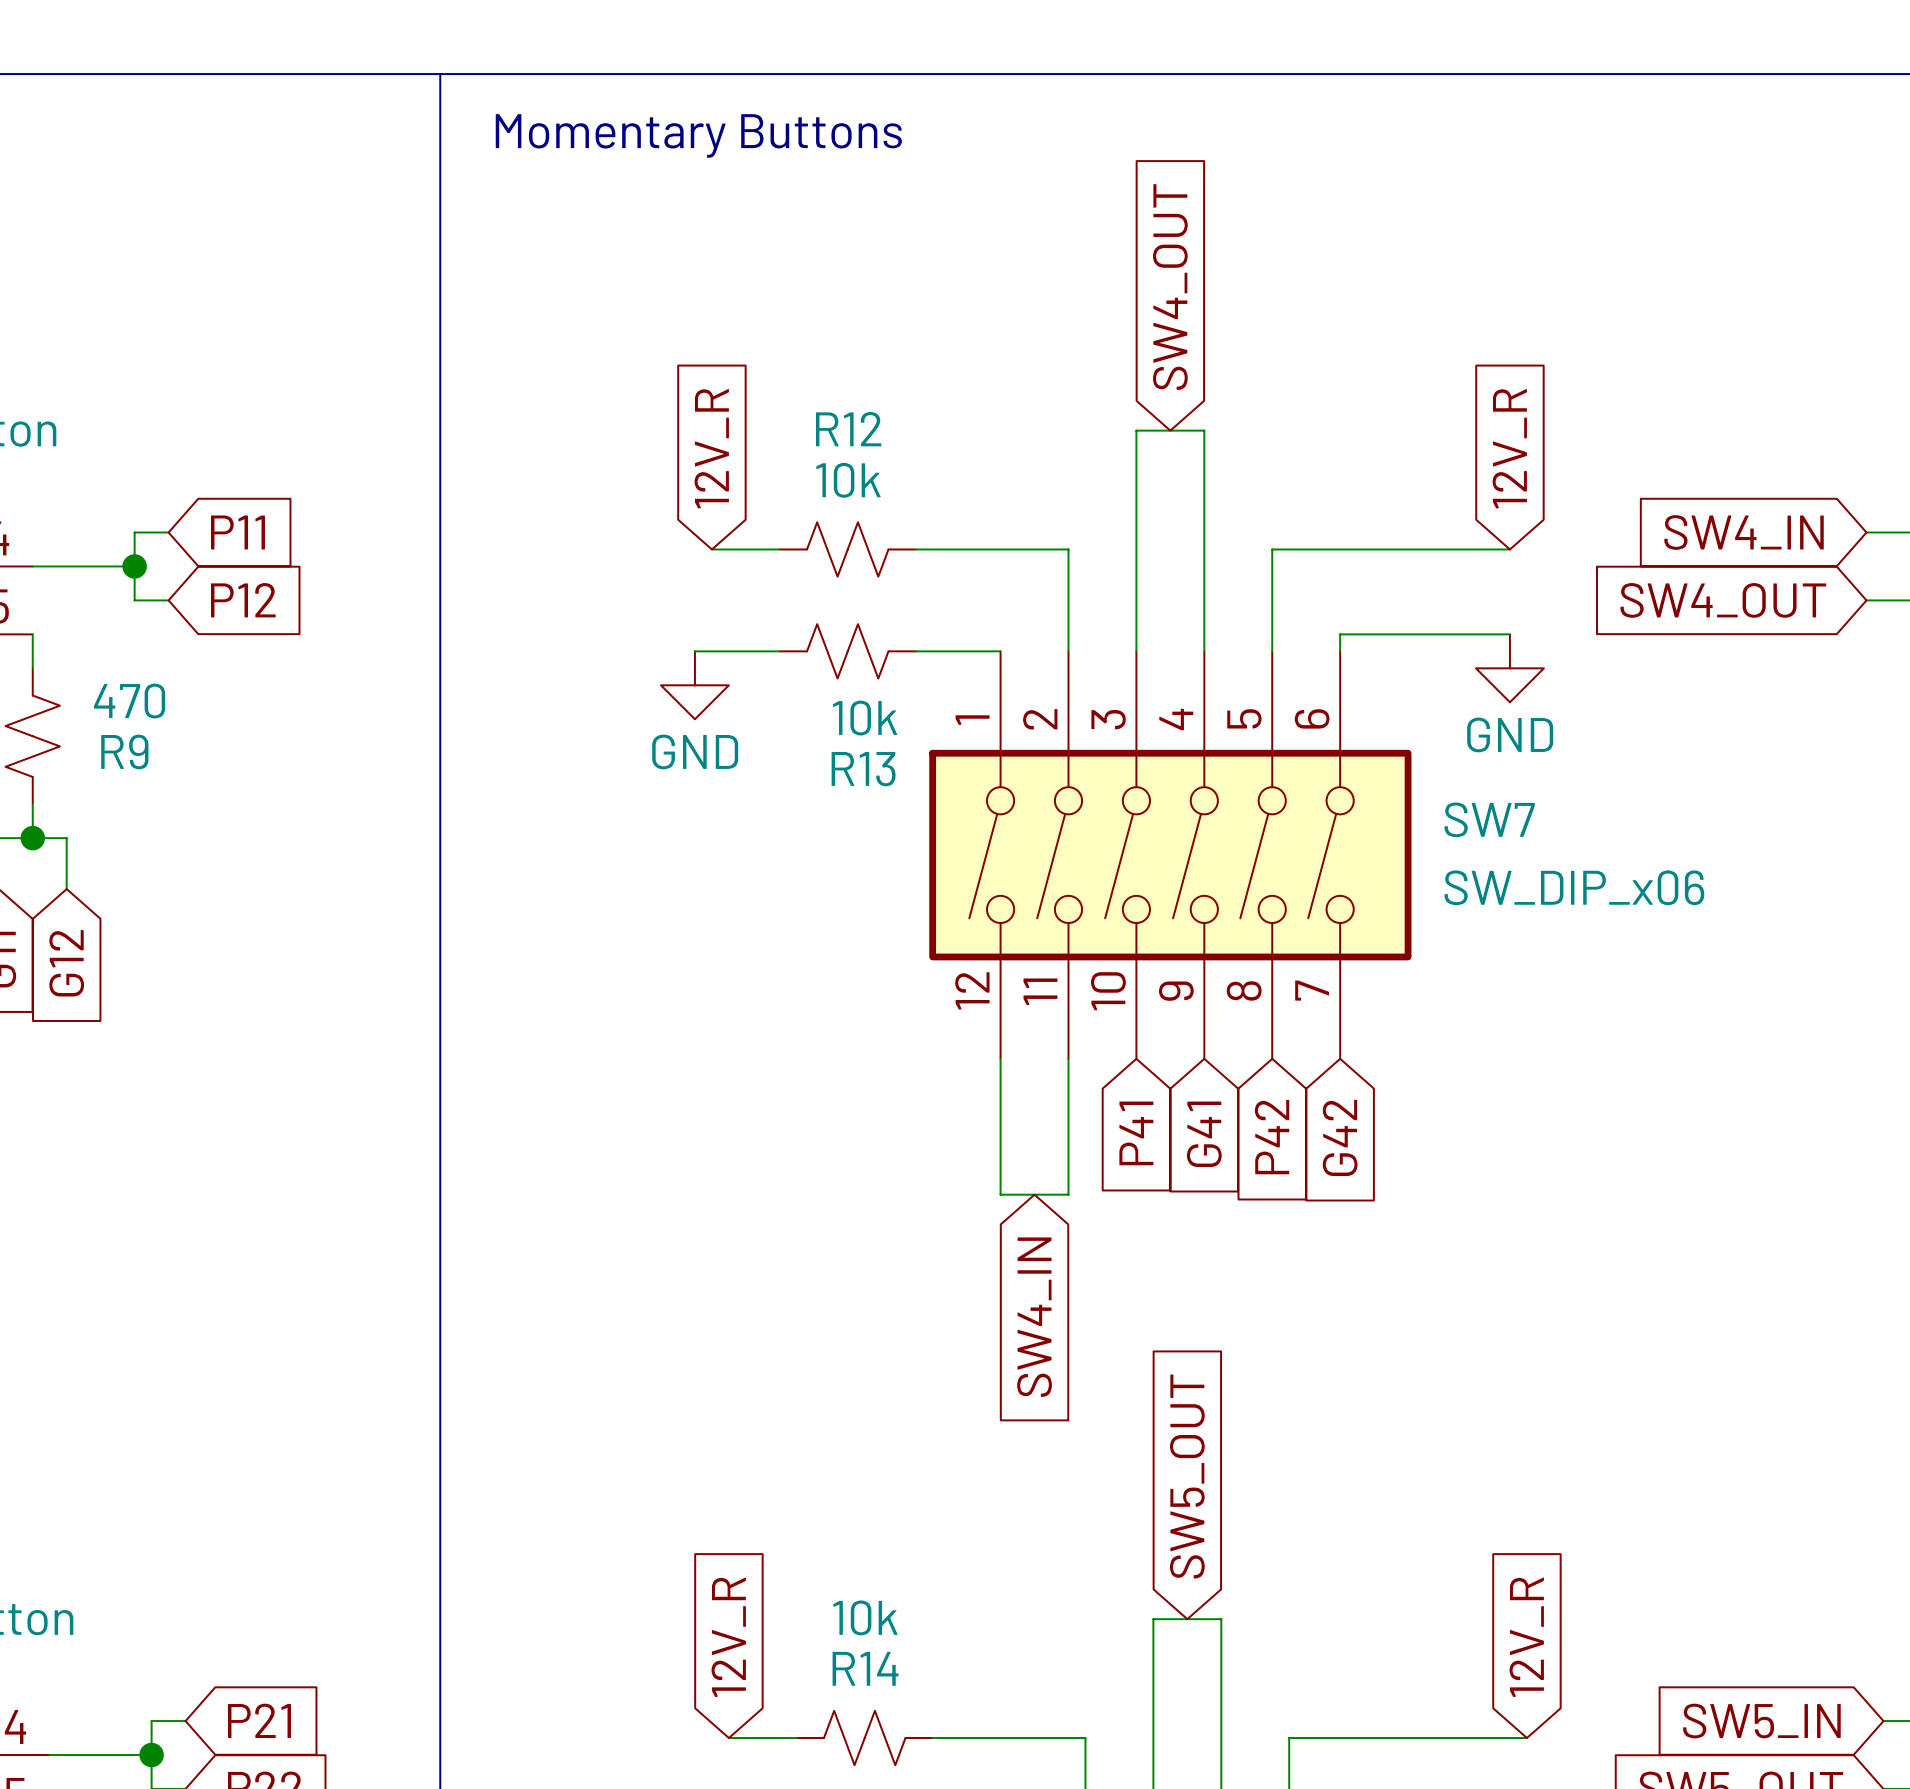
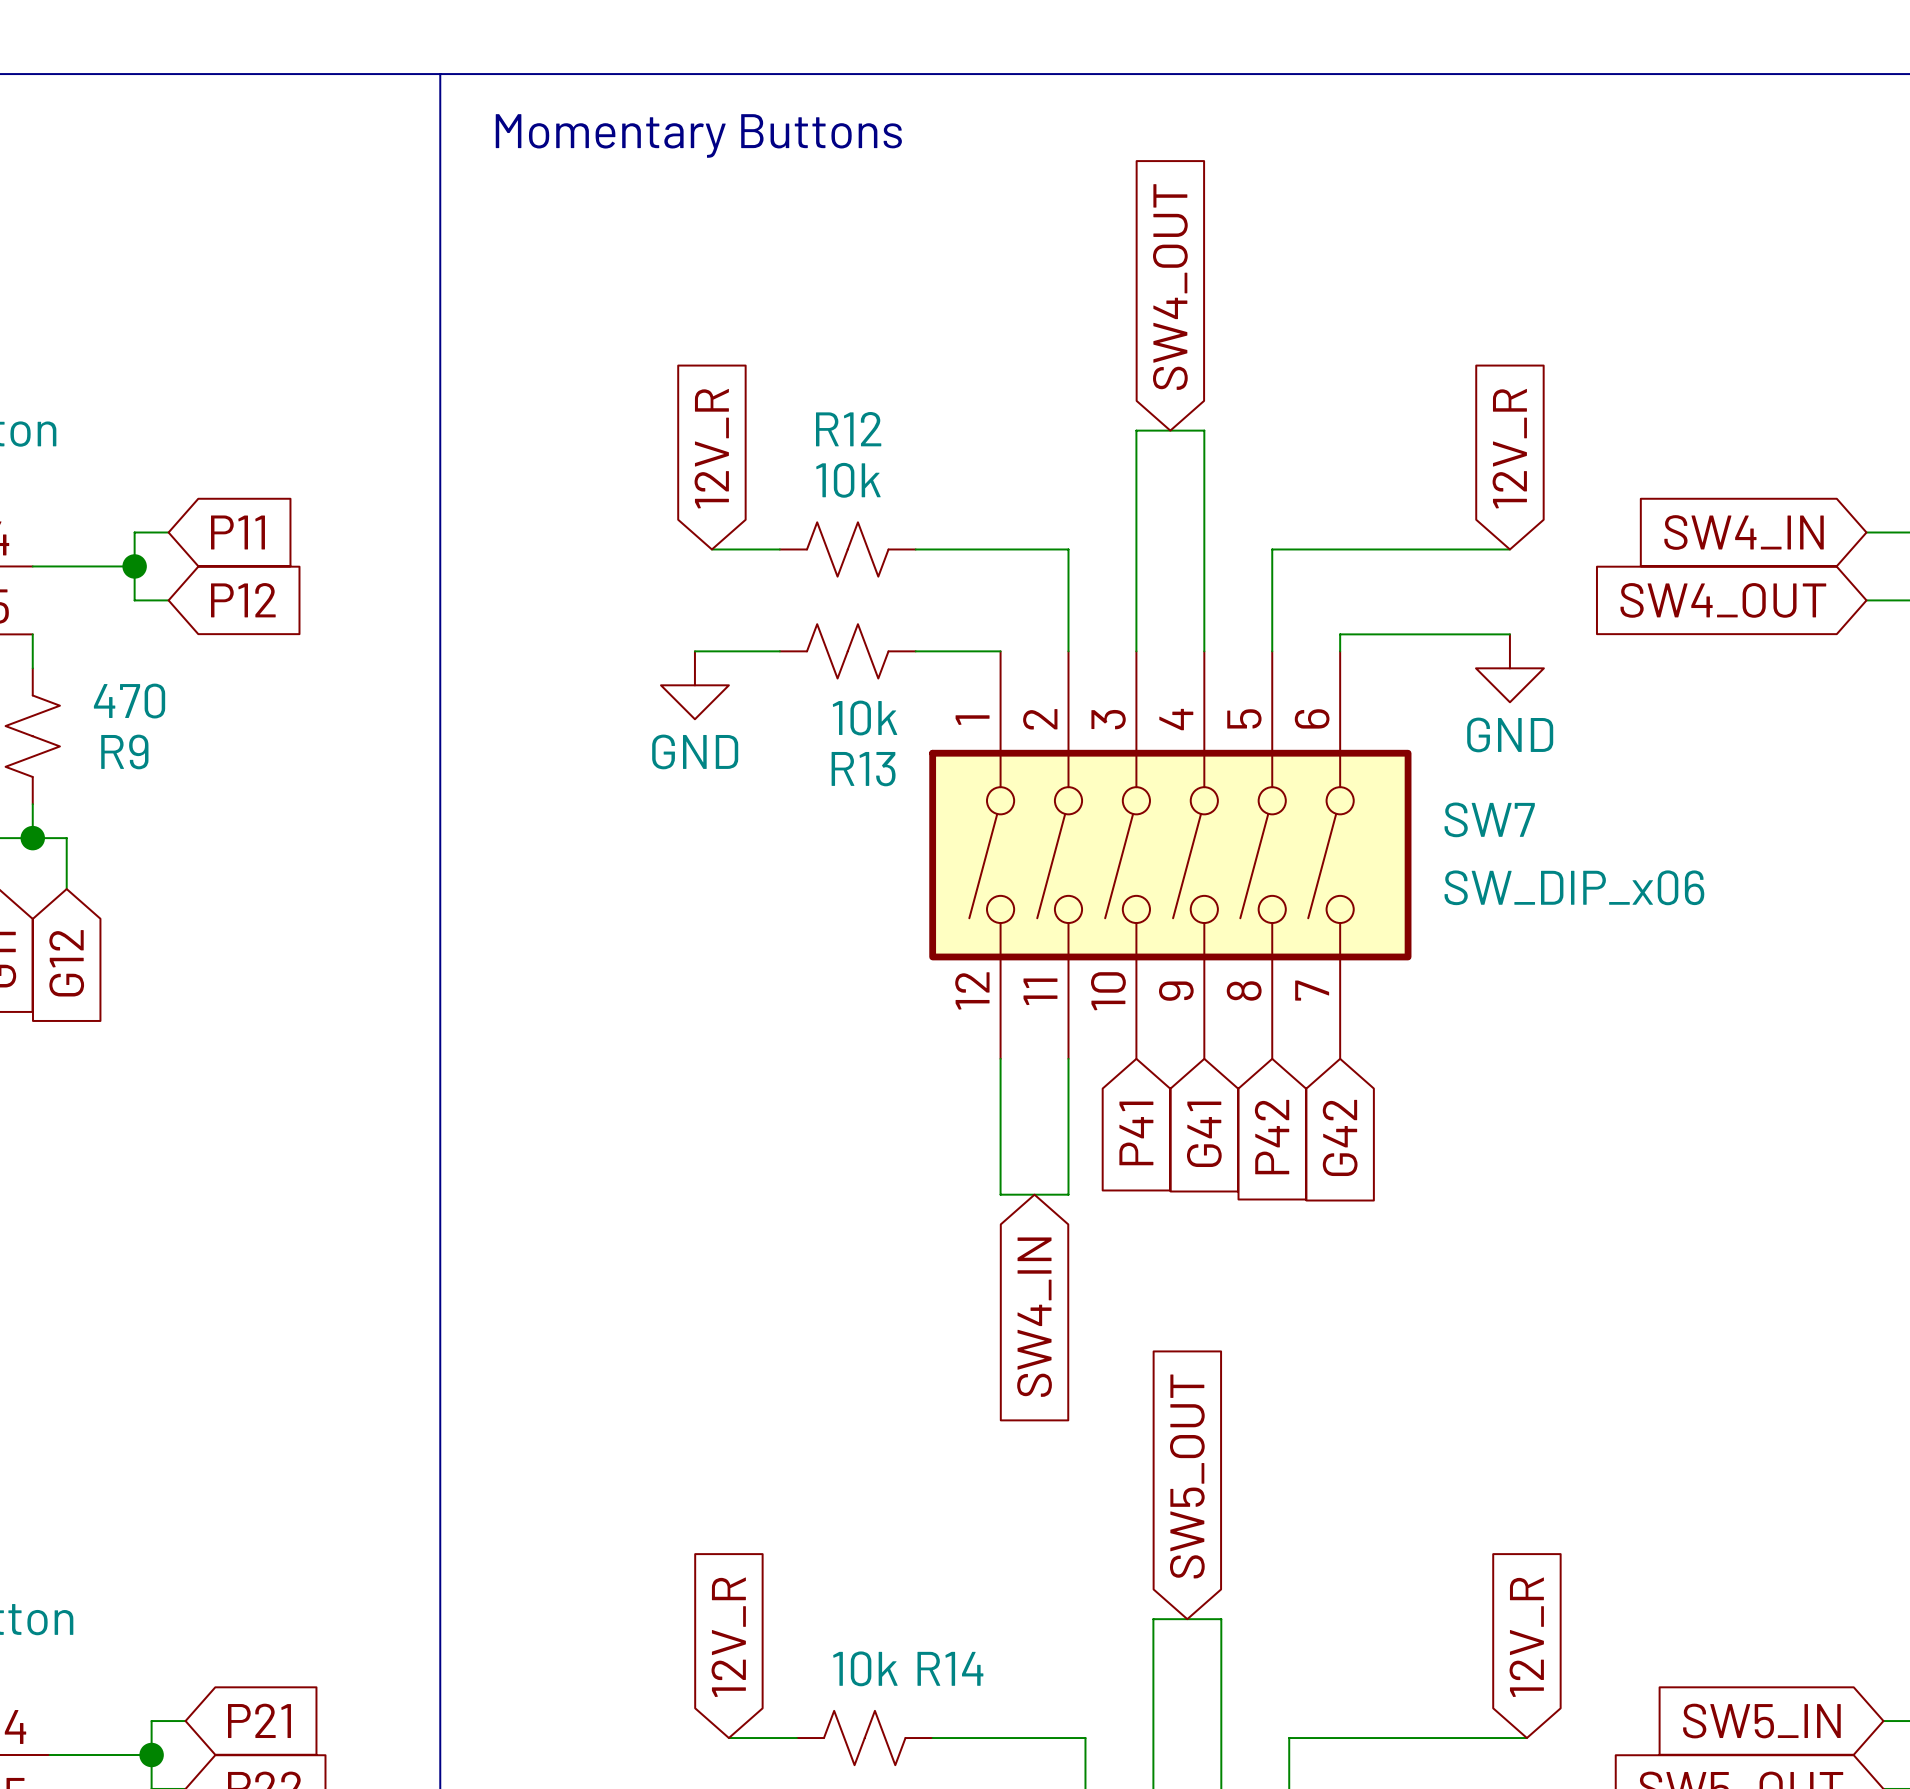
R14 value position: 10k (865, 1617) -> 10k (865, 1668)
R14 name position: R14 (865, 1668) -> R14 (950, 1668)

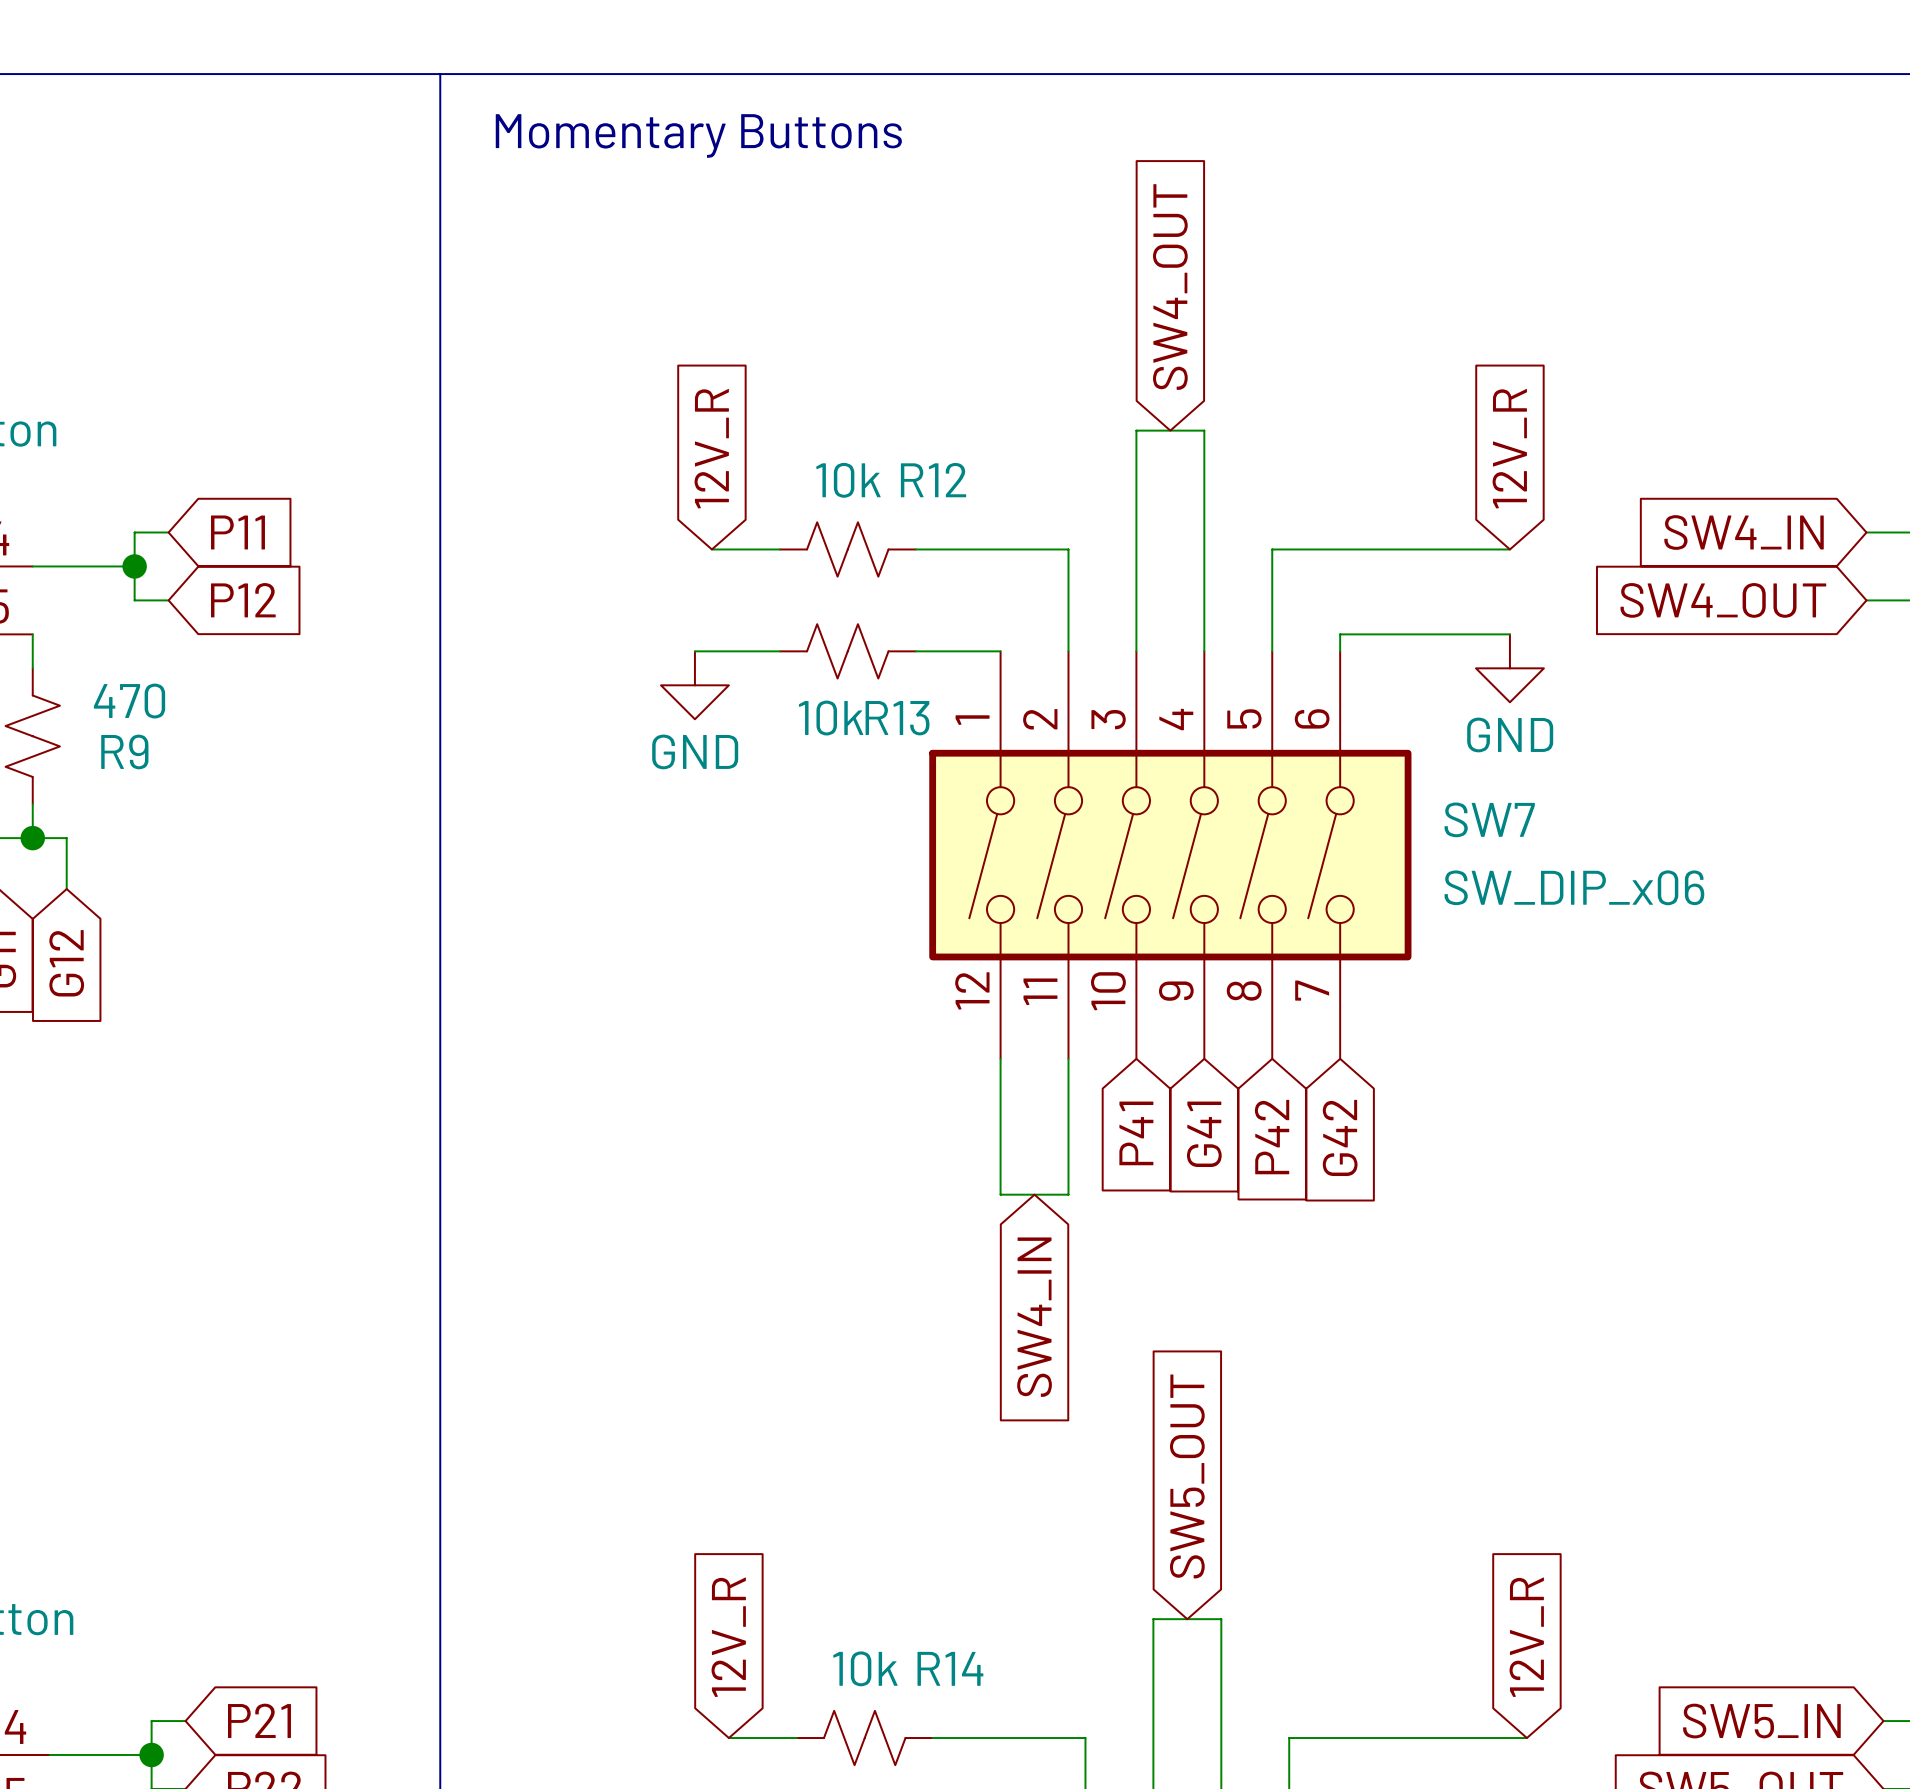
R12 name position: R12 (848, 429) -> R12 (933, 480)
R13 value position: 10k (865, 718) -> 10k (831, 718)
R13 name position: R13 (863, 769) -> R13 (897, 718)

